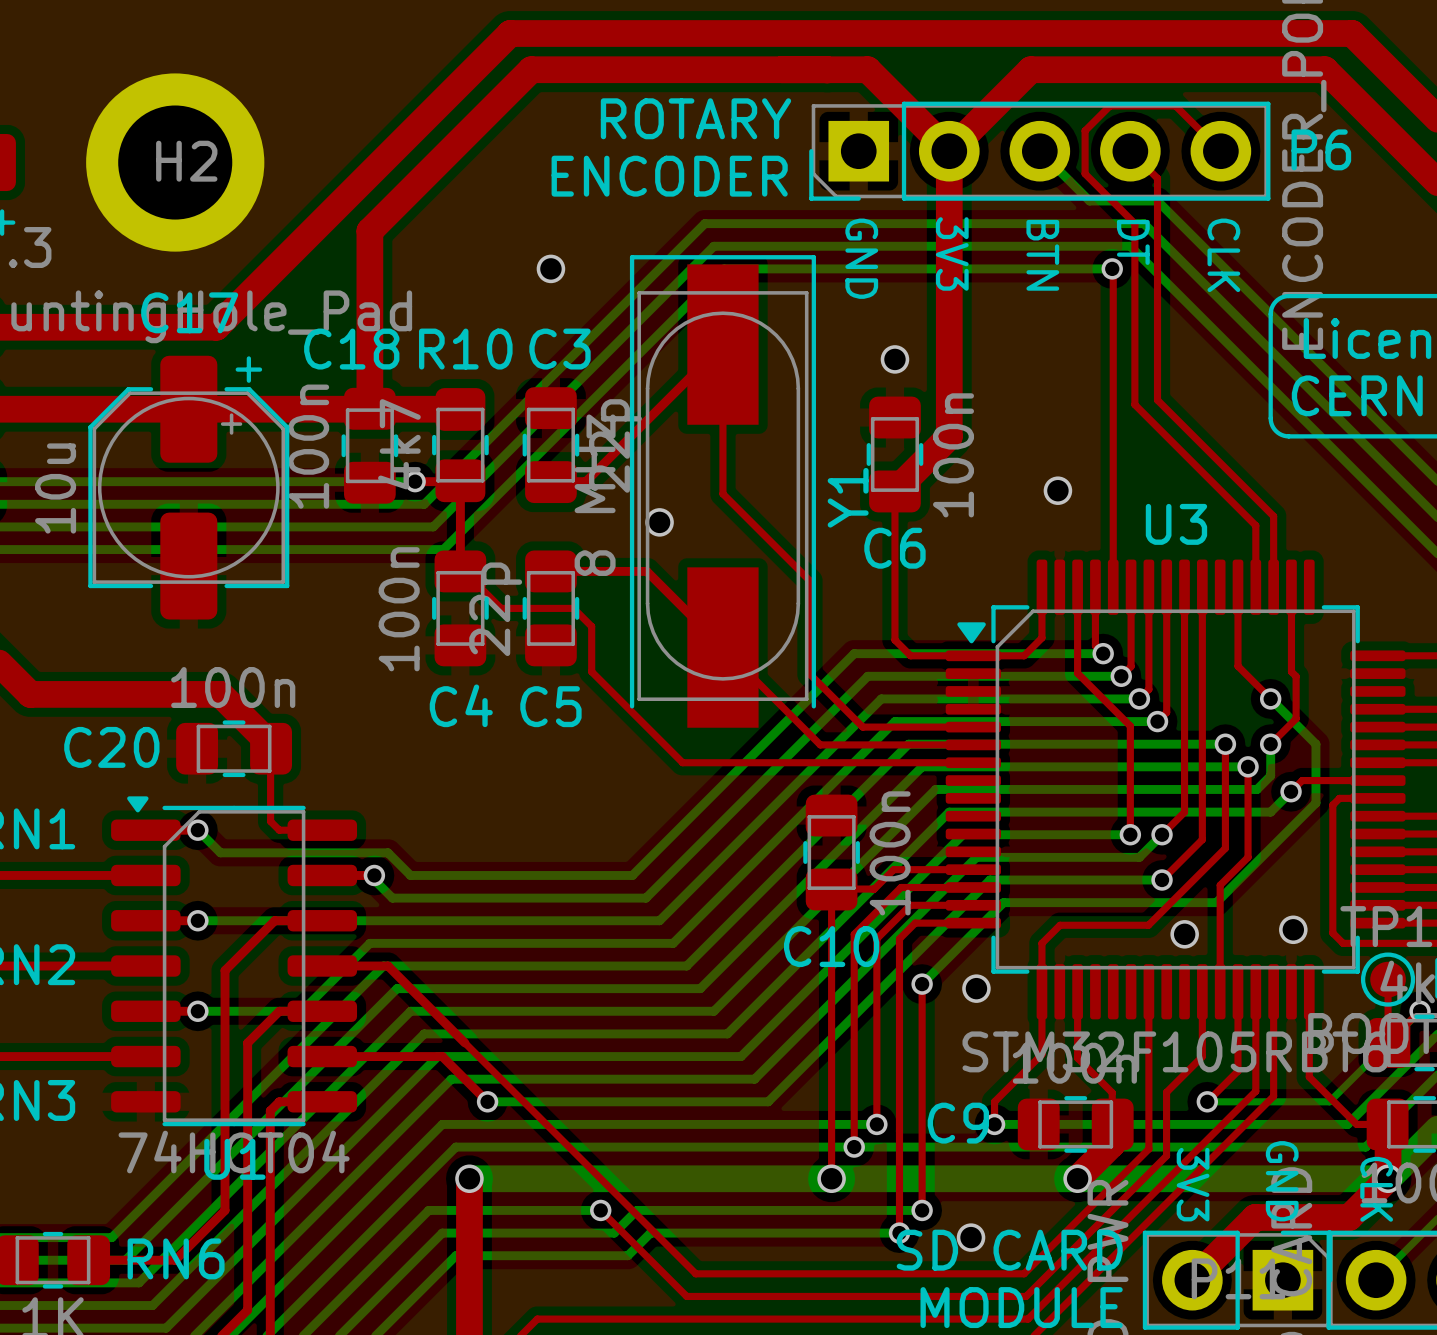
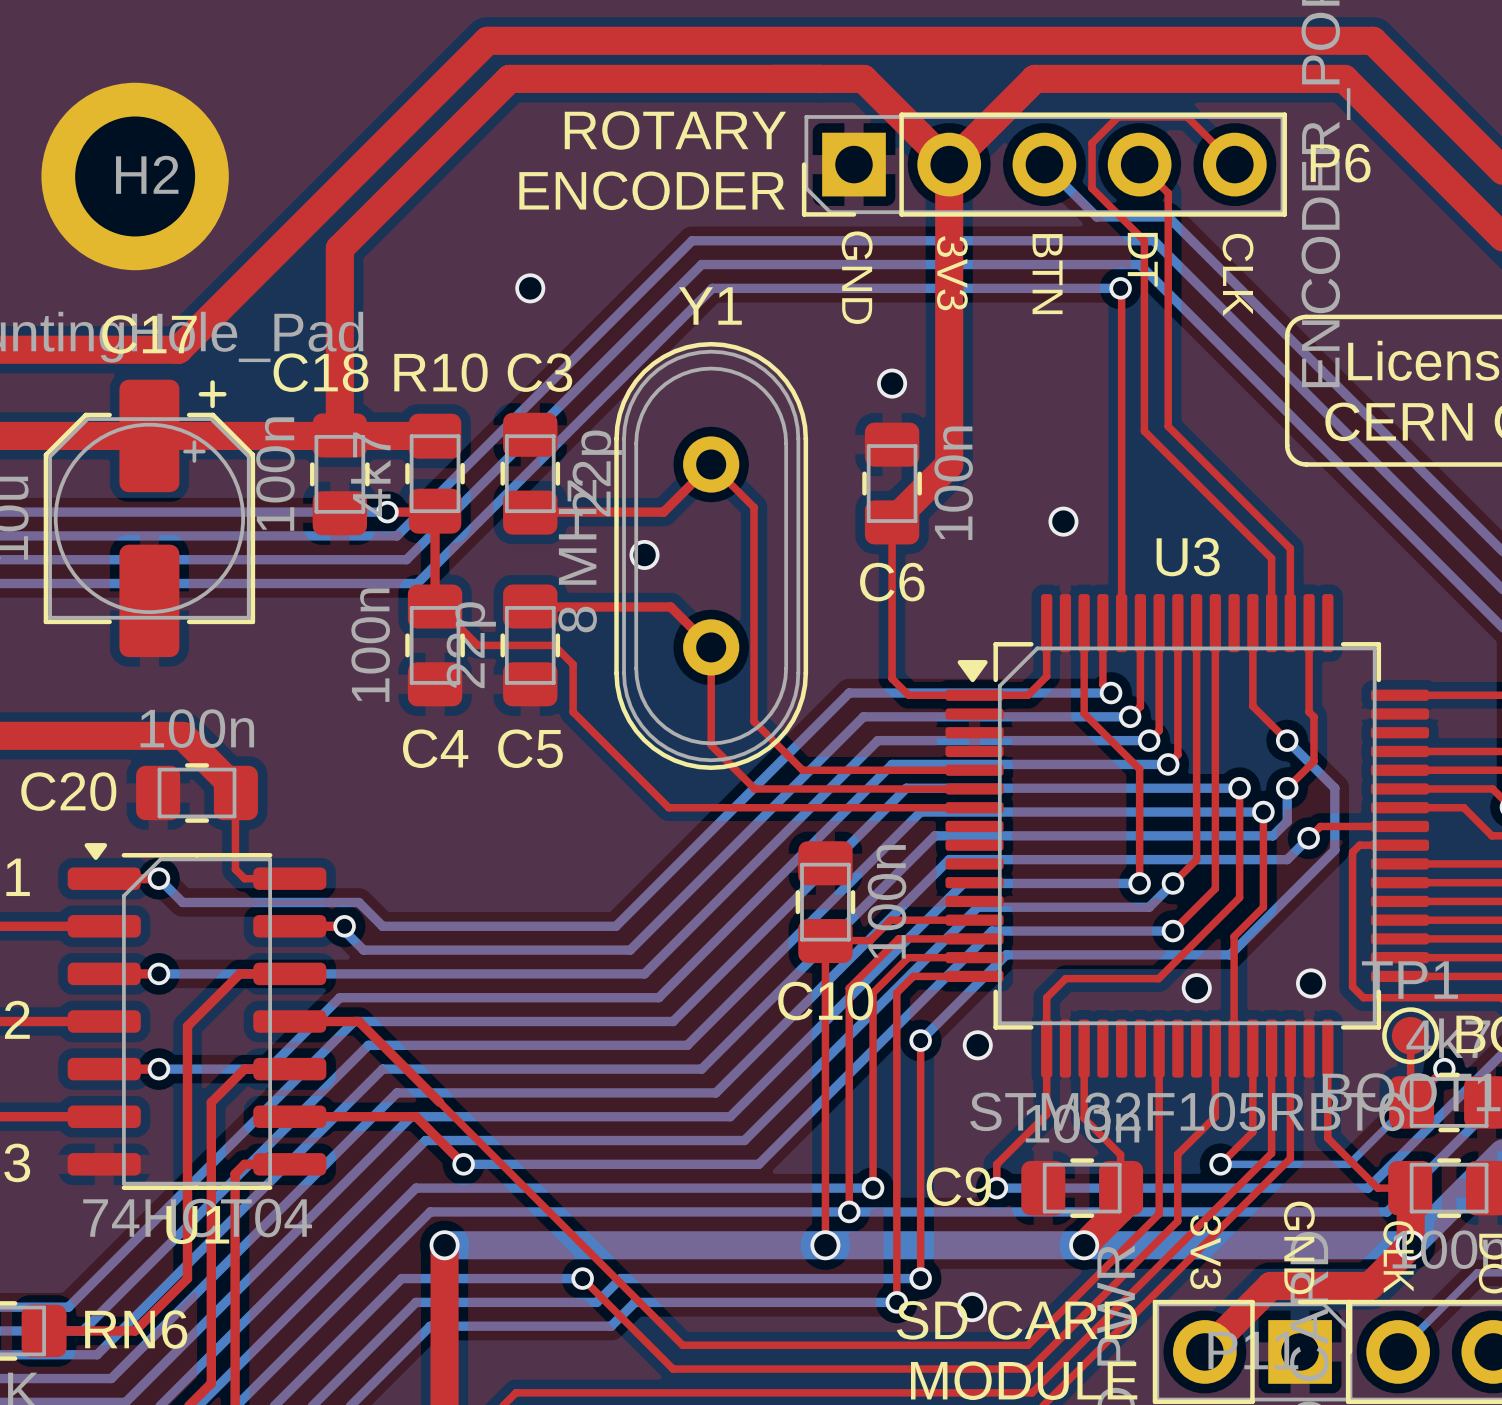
Y1 footprint: [629, 255, 816, 728] -> [614, 341, 809, 771]
top track: (585, 481) (722, 344) (722, 493) (809, 580) (809, 674) (862, 727) -> (567, 512) (663, 512) (711, 464) (754, 507) (754, 721) (802, 770) (858, 770)
Y1 name position: Y1 (848, 497) -> Y1 (710, 306)
top track: (550, 571) (646, 571) (820, 744) -> (530, 606) (670, 606) (711, 647) (711, 745) (754, 788) (813, 788)

